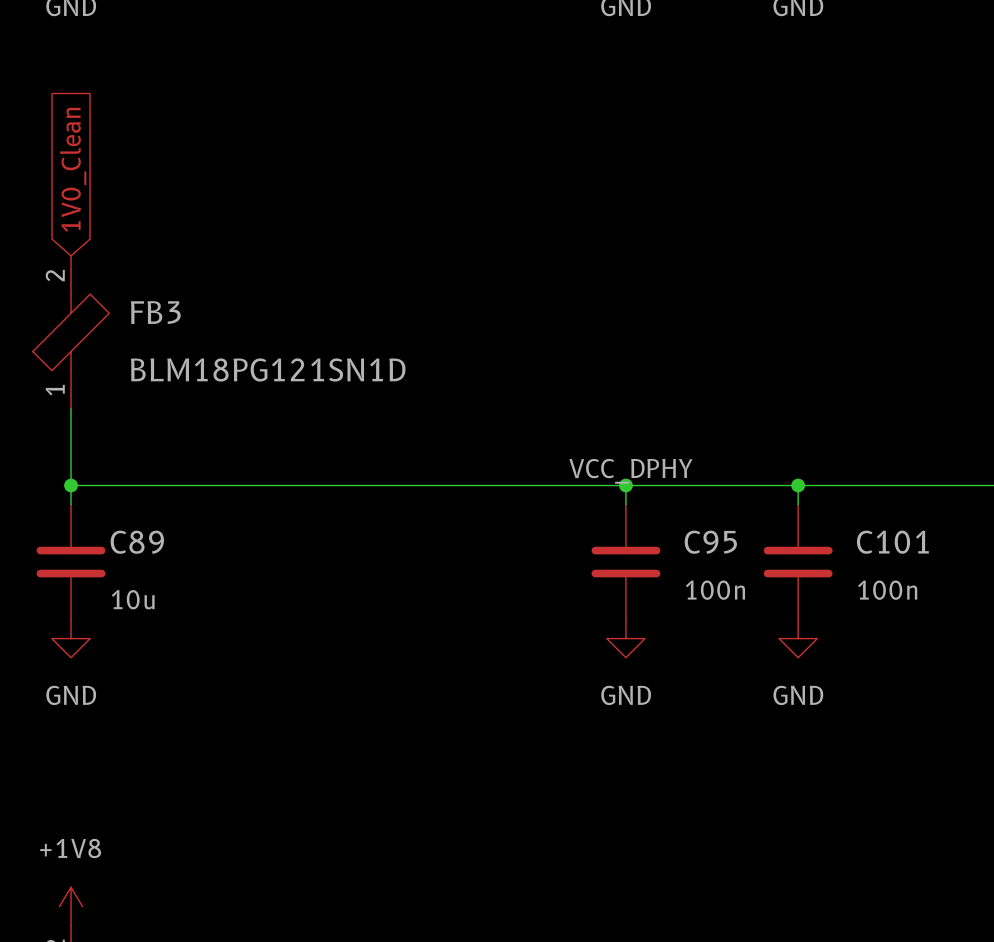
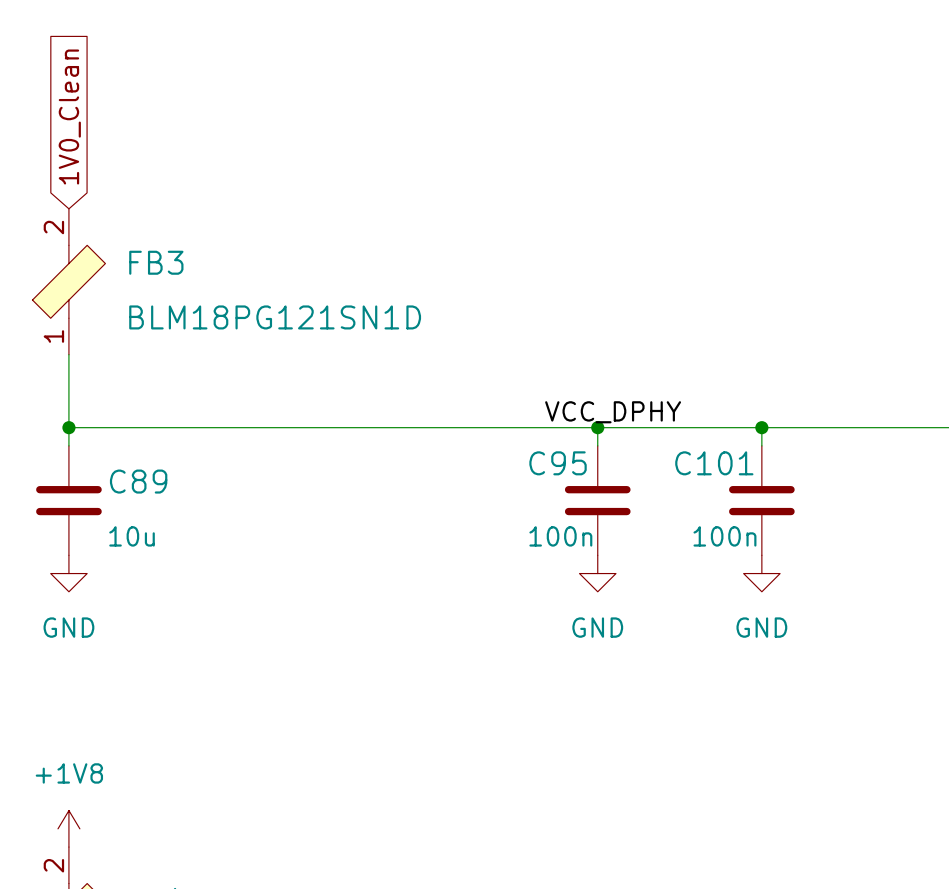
C95 name position: C95 (710, 542) -> C95 (558, 463)
C101 name position: C101 (892, 542) -> C101 (714, 463)
C95 text position: 100n (715, 590) -> 100n (560, 536)
C101 text position: 100n (887, 590) -> 100n (724, 536)

